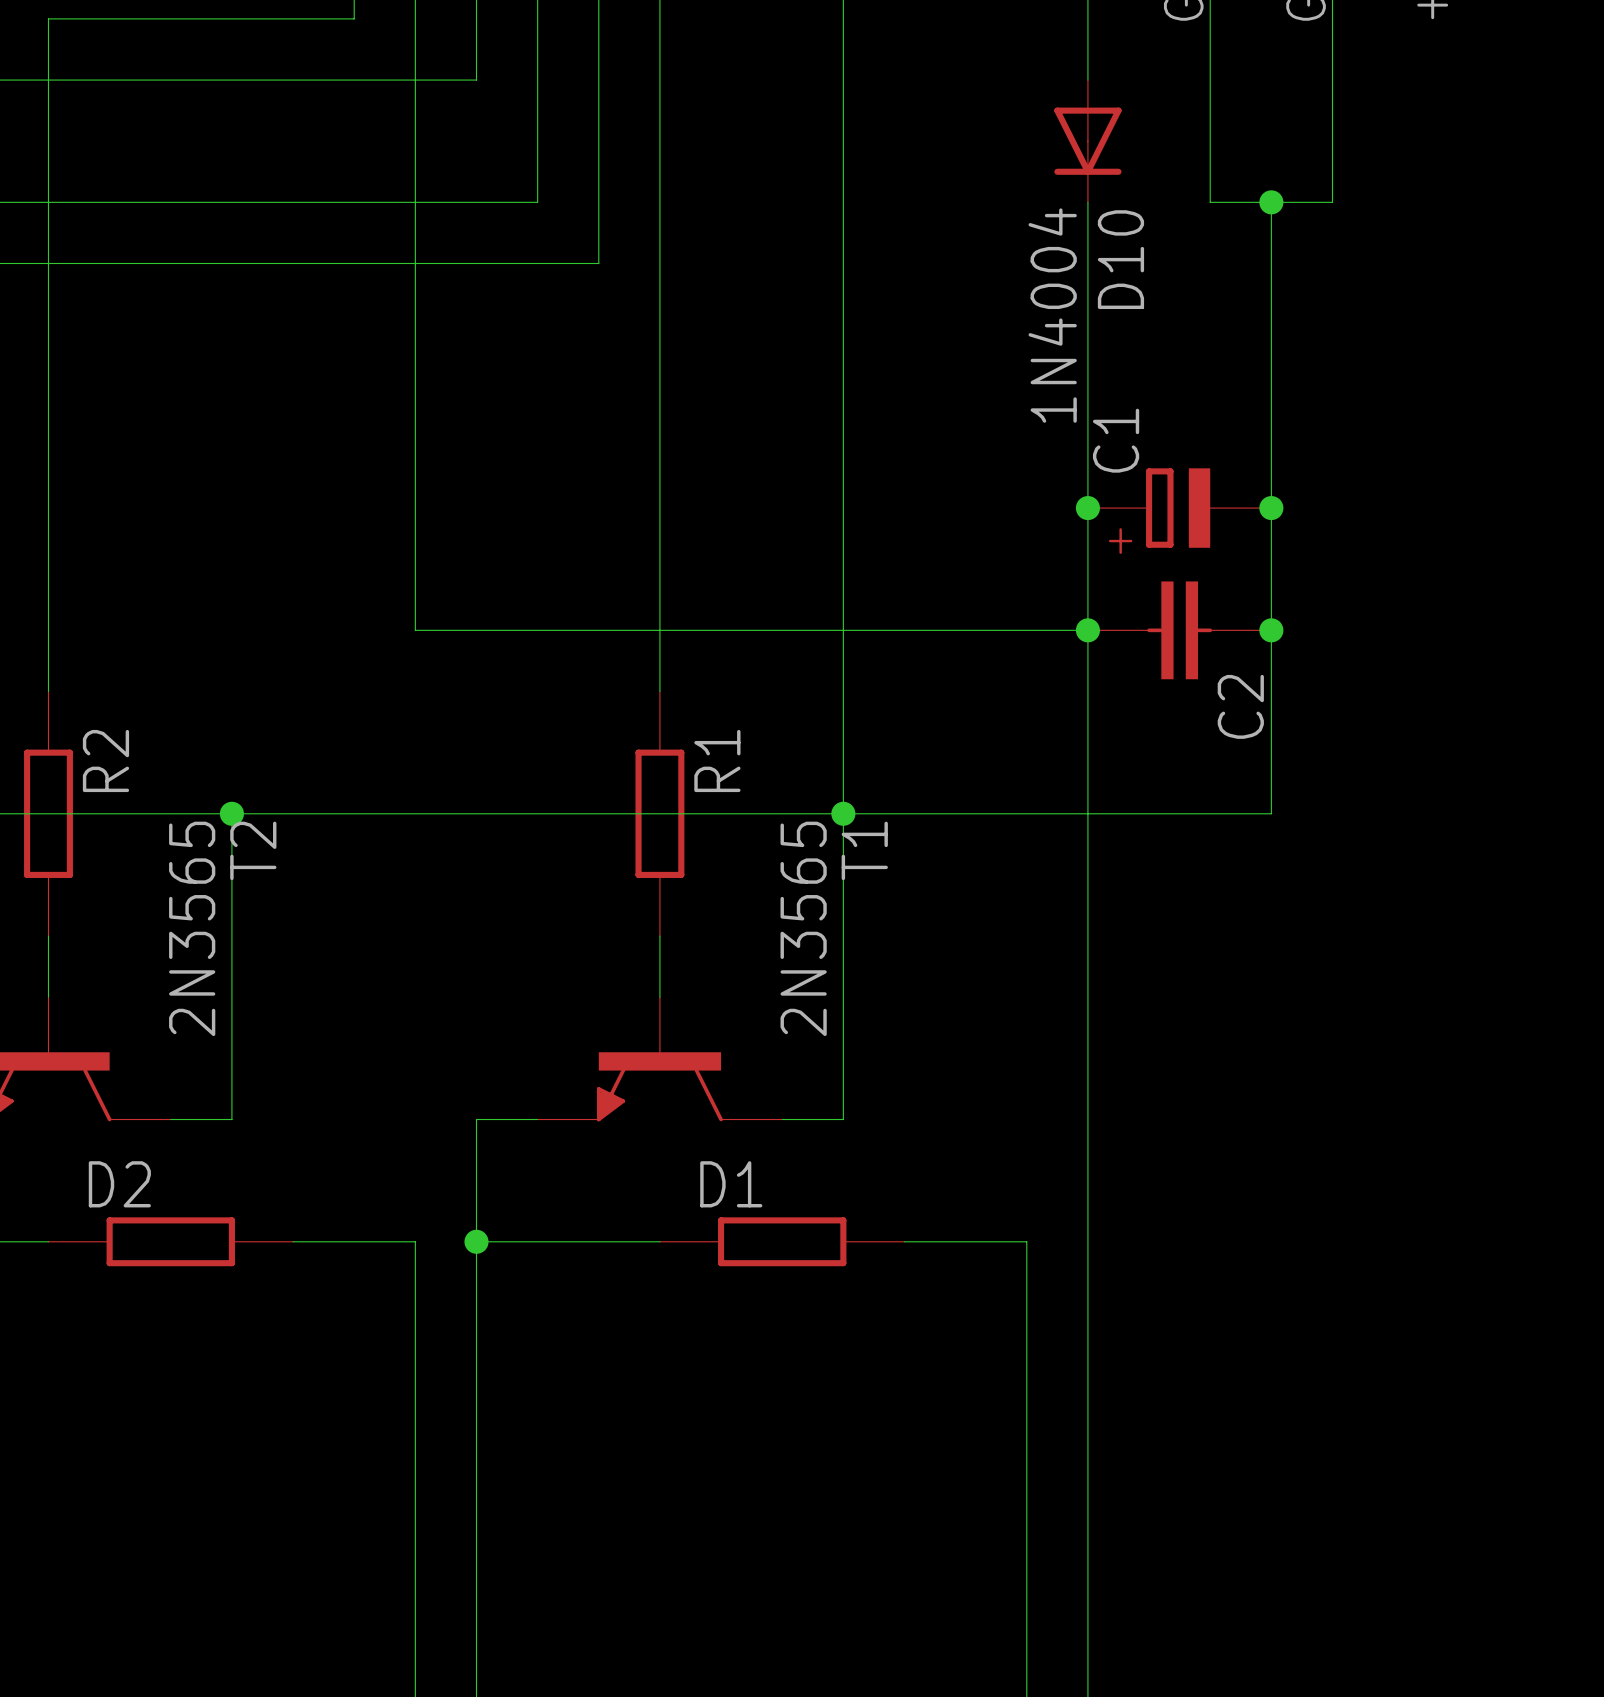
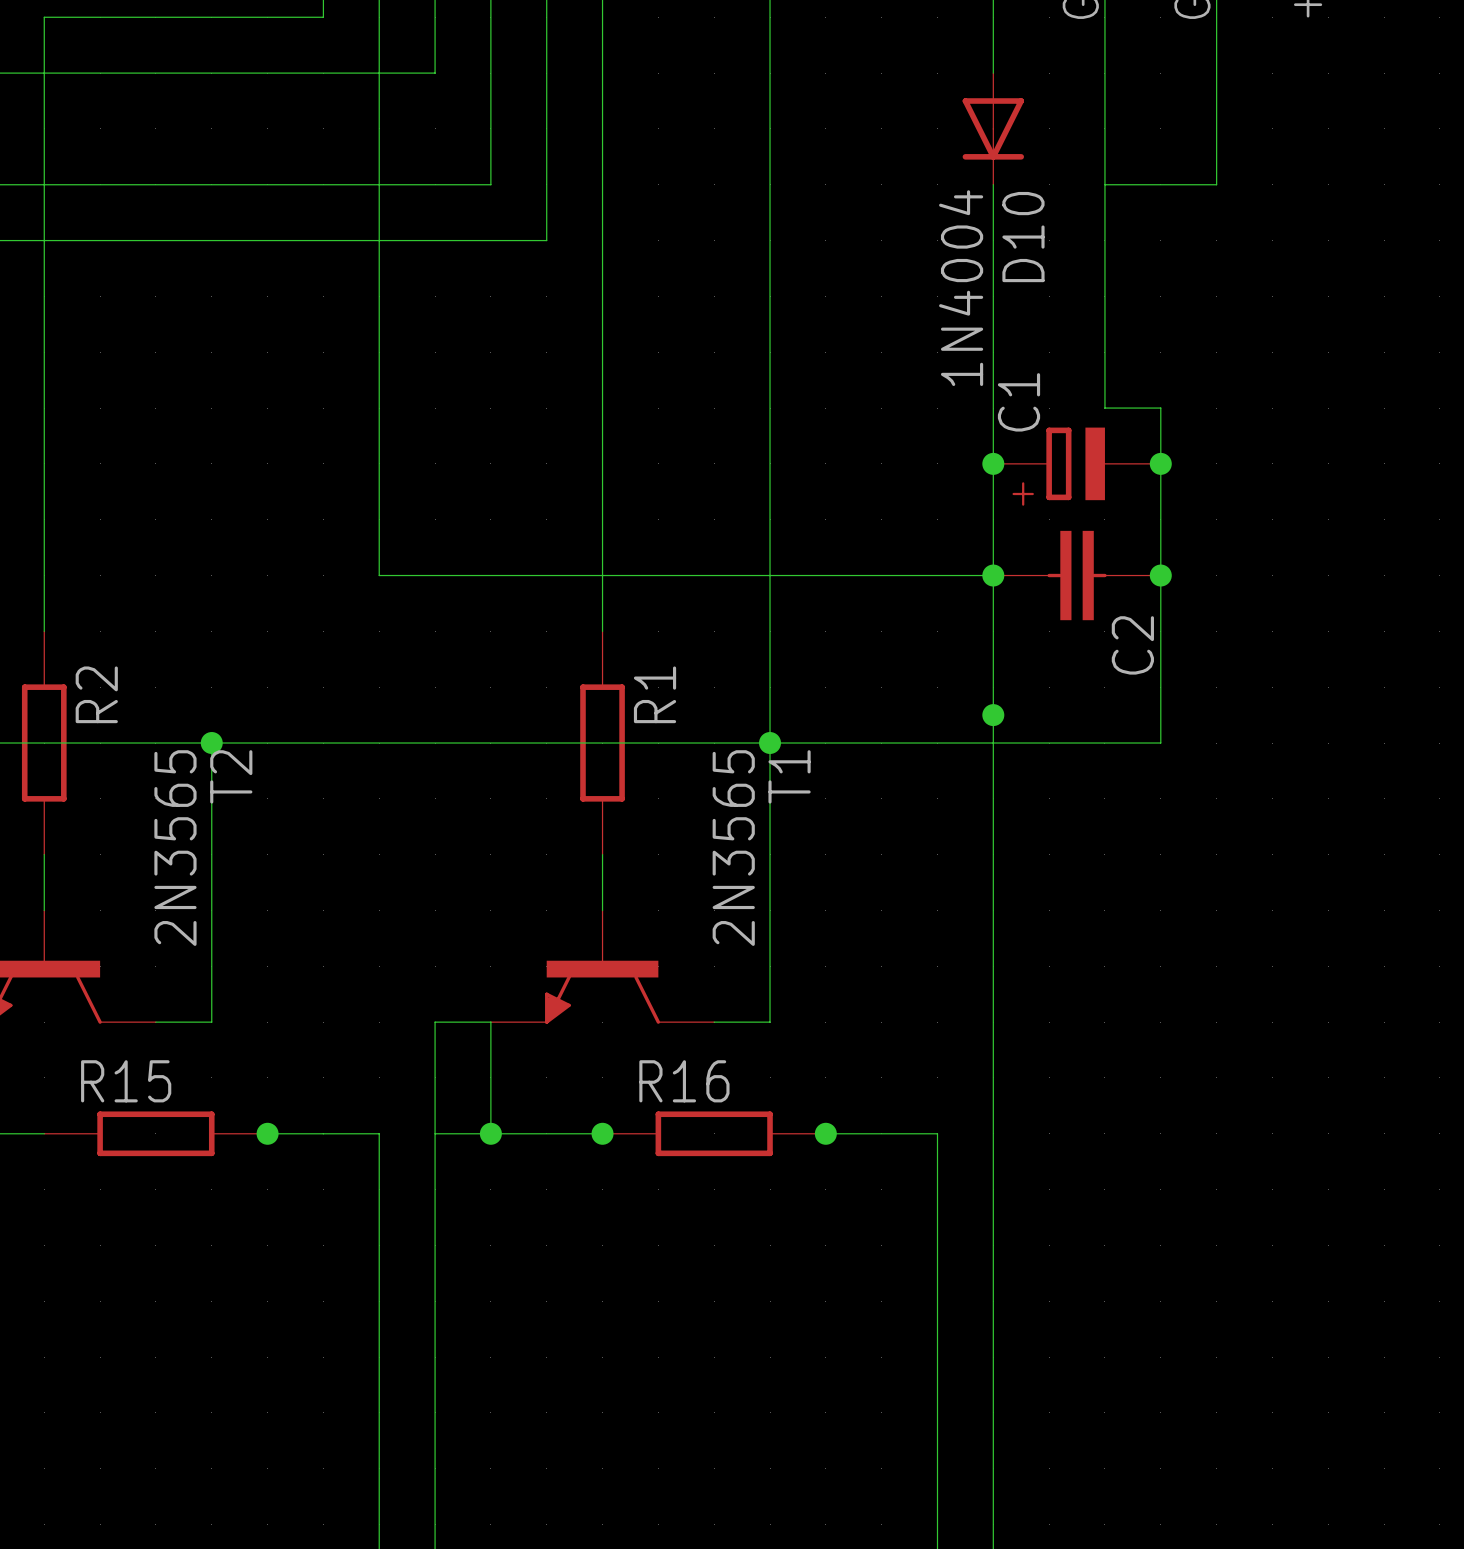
wire: (1271, 202) (1271, 446) -> (1104, 184) (1104, 408) (1160, 408)
junction: (1271, 202) -> none
junction: none -> (993, 715)
wire: none -> (490, 1022) (490, 1133)
D2 name: D2 (119, 1184) -> R15 (126, 1081)
D1 name: D1 (731, 1184) -> R16 (684, 1081)
junction: none -> (267, 1133)
junction position: (476, 1241) -> (490, 1133)
junction: none -> (602, 1133)
junction: none -> (825, 1133)

